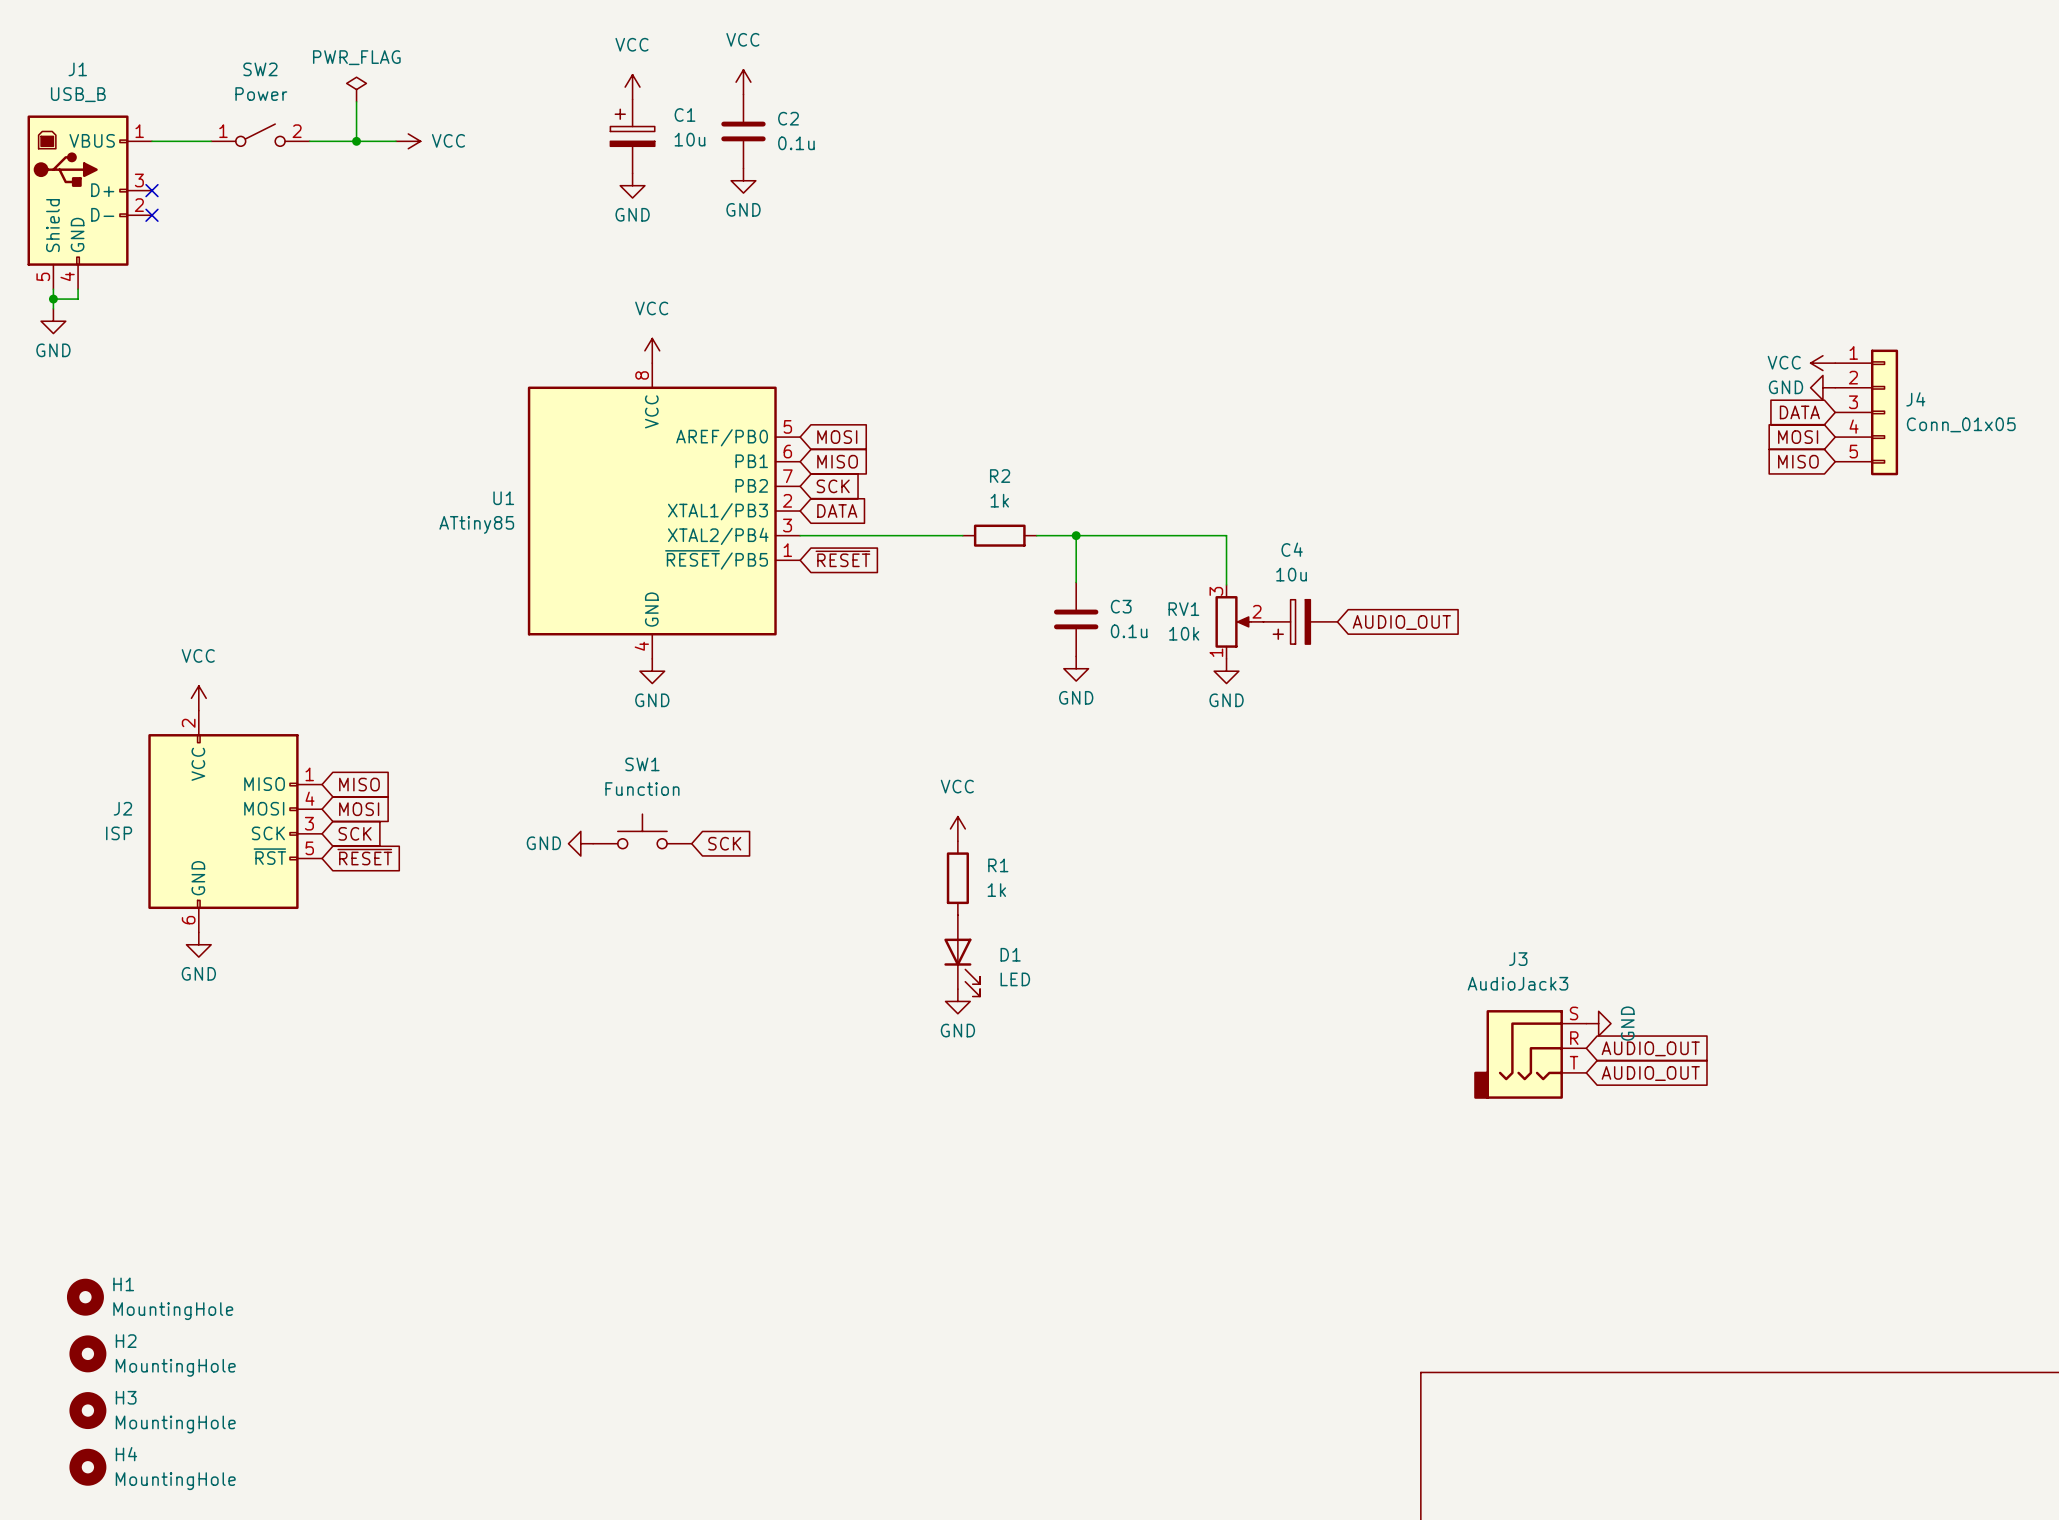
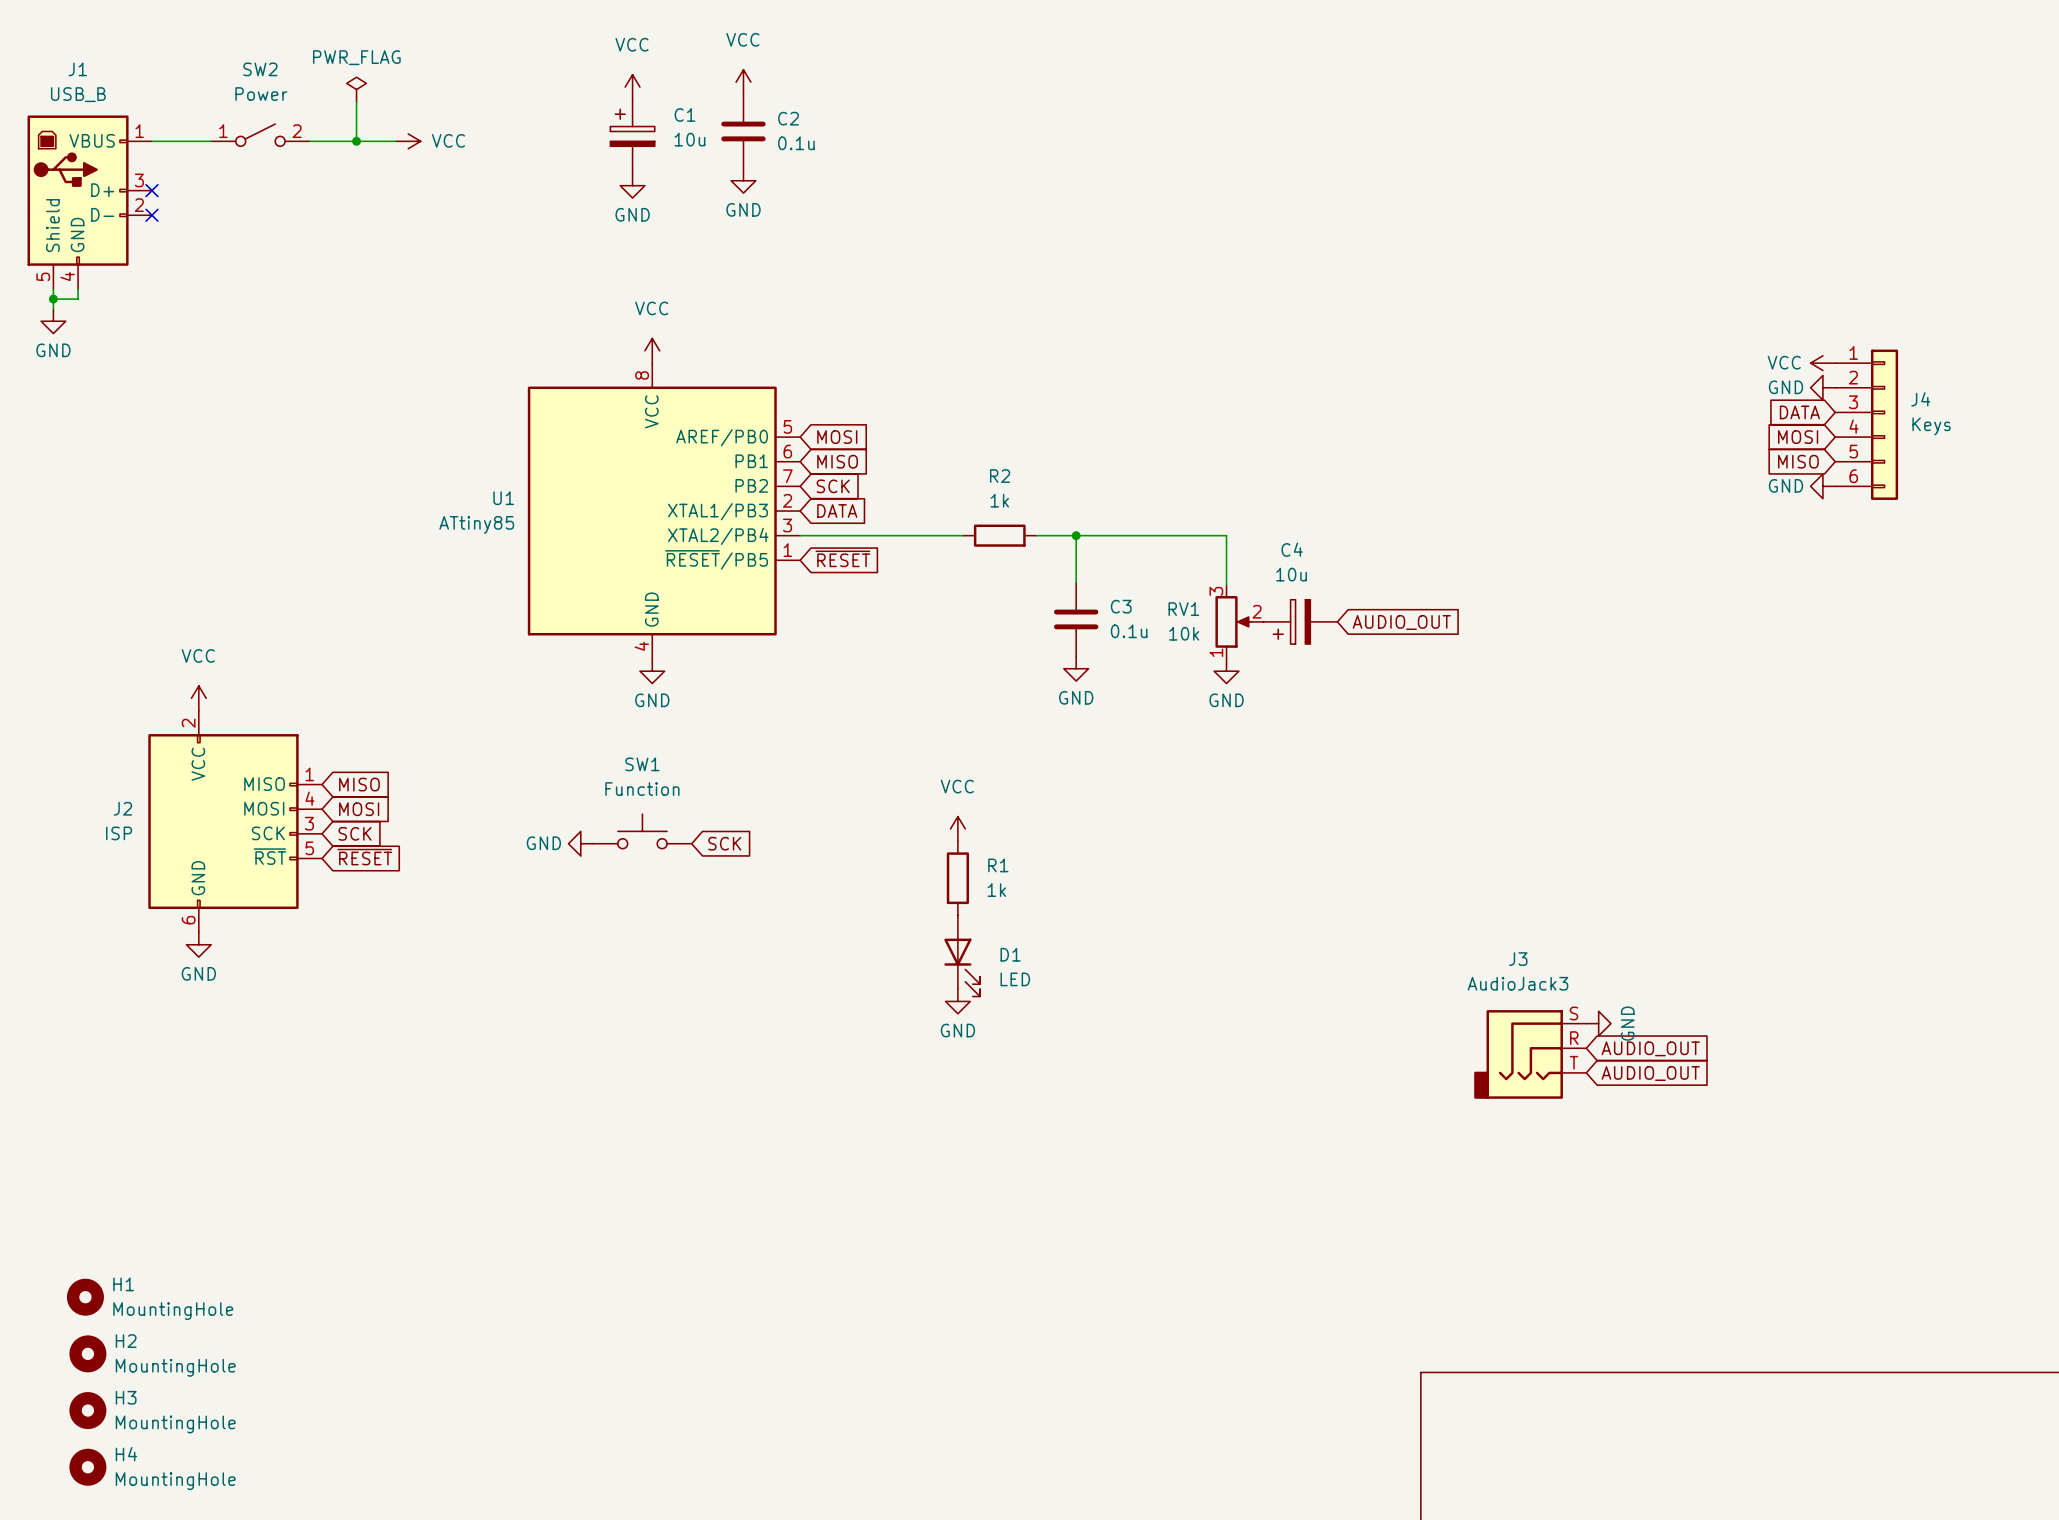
J4 symbol: [1835, 349, 1899, 476] -> [1835, 349, 1899, 500]
J4 value: Conn_01x05 (1961, 424) -> Keys (1931, 426)
power symbol: none -> GND (1822, 486)

